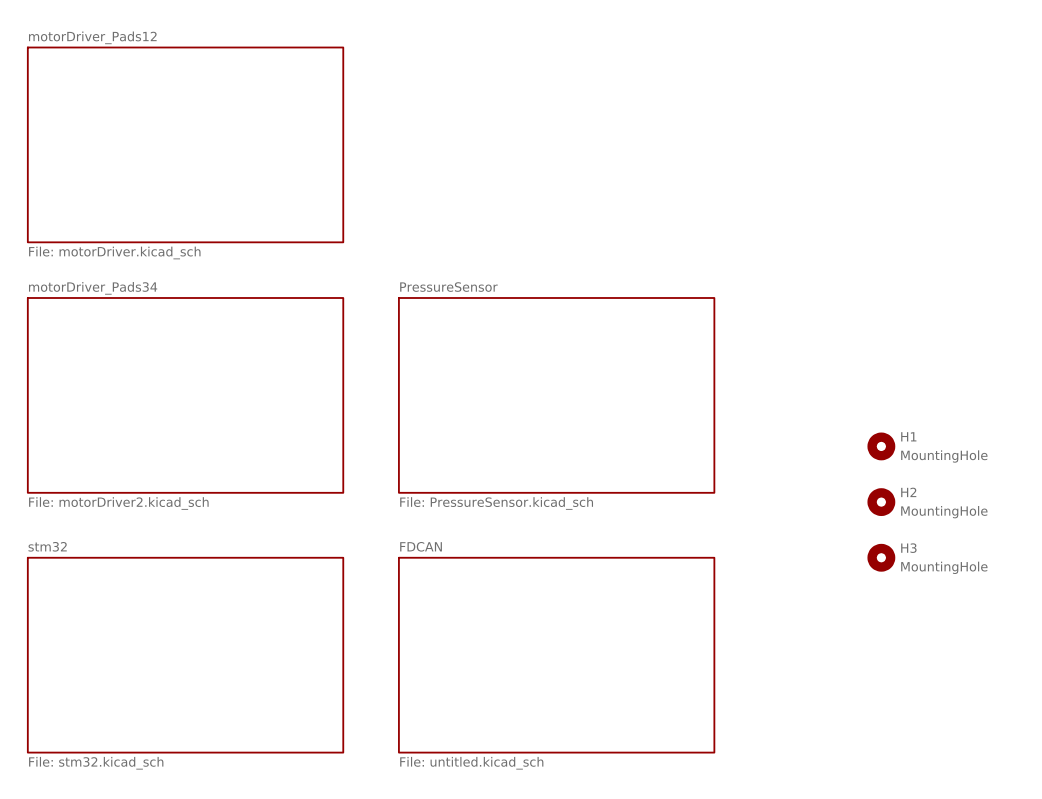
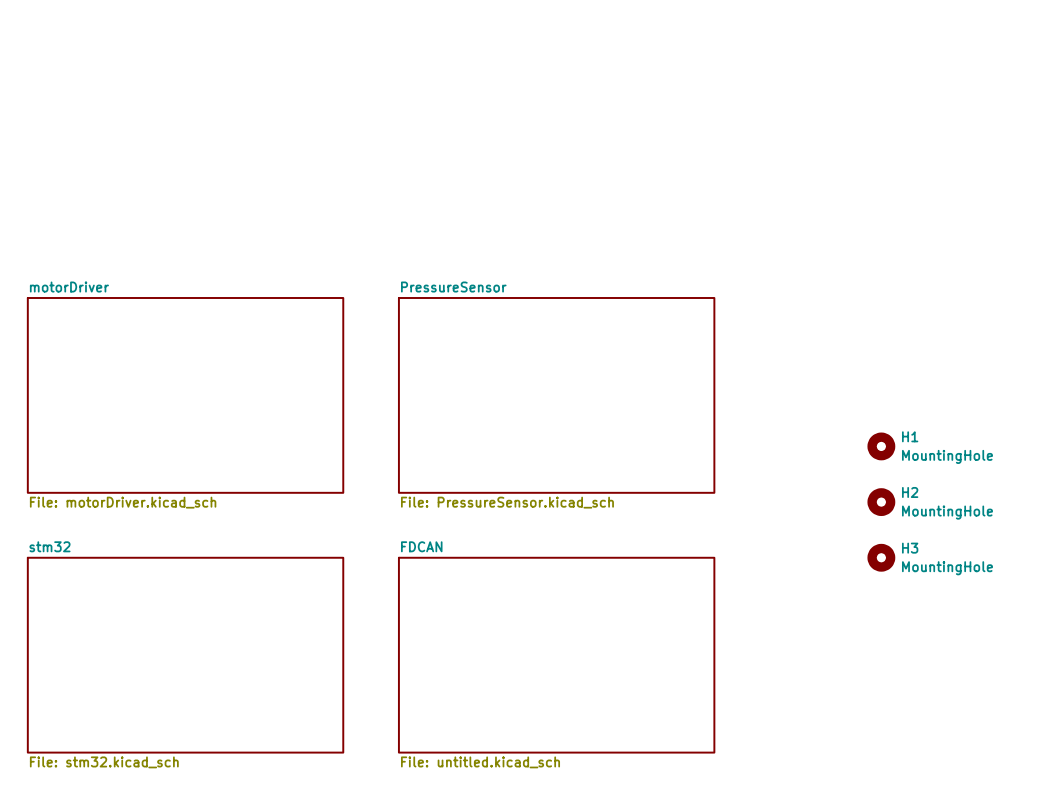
sheet motorDriver_Pads12: File: motorDriver.kicad_sch (185, 144) -> none
sheet motorDriver_Pads34 name: motorDriver_Pads34 (93, 288) -> motorDriver (69, 287)
sheet motorDriver_Pads34 value: File: motorDriver2.kicad_sch (118, 503) -> File: motorDriver.kicad_sch (123, 502)

